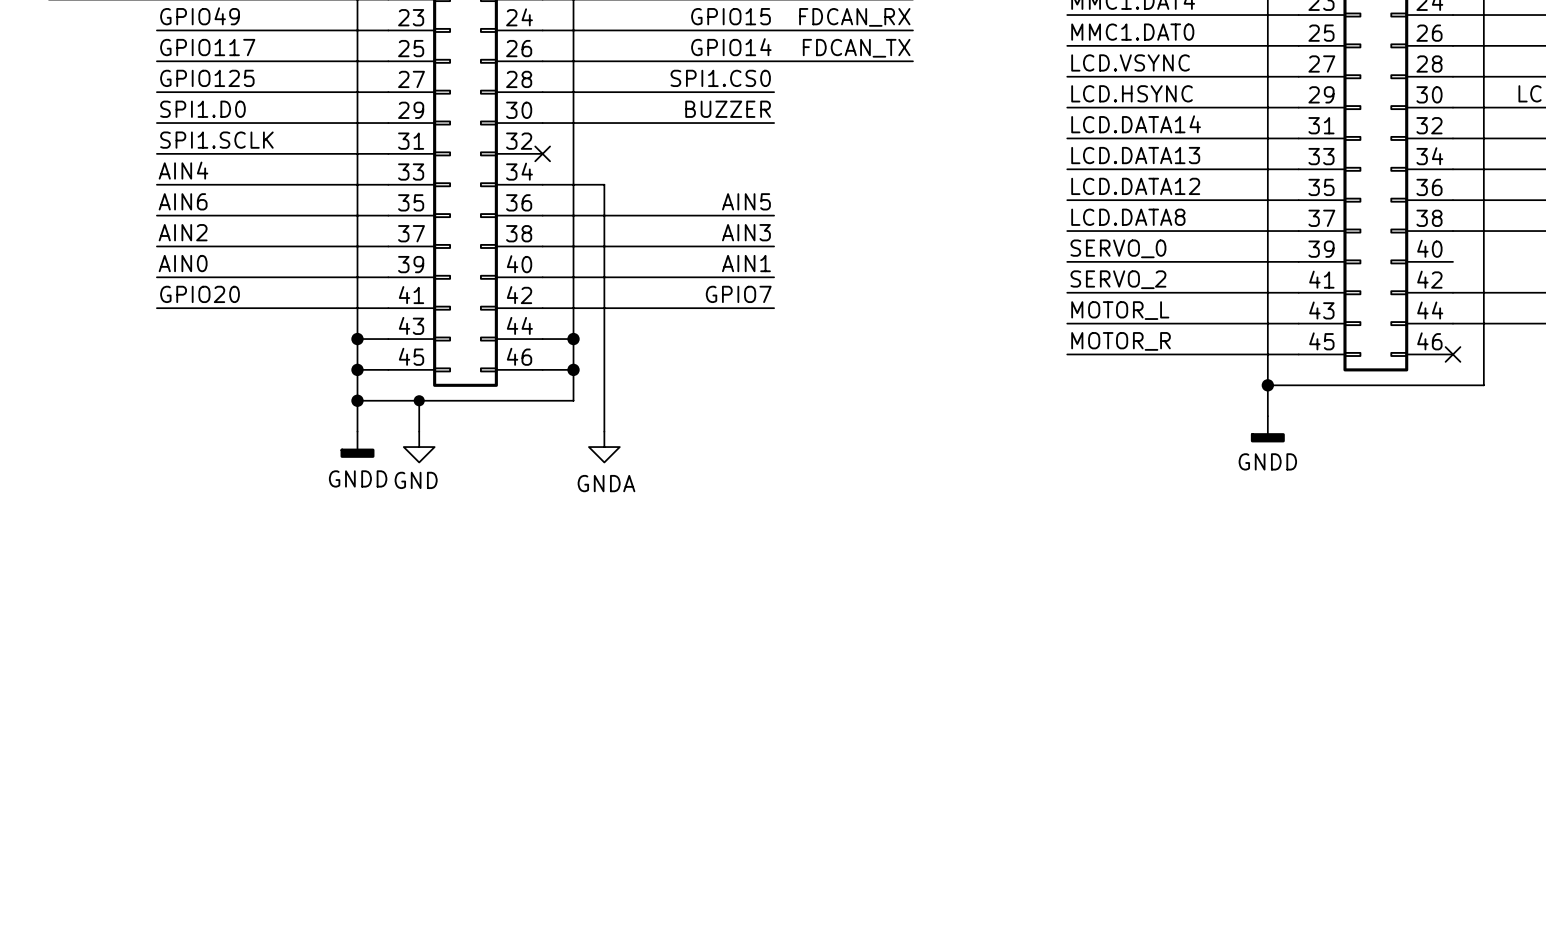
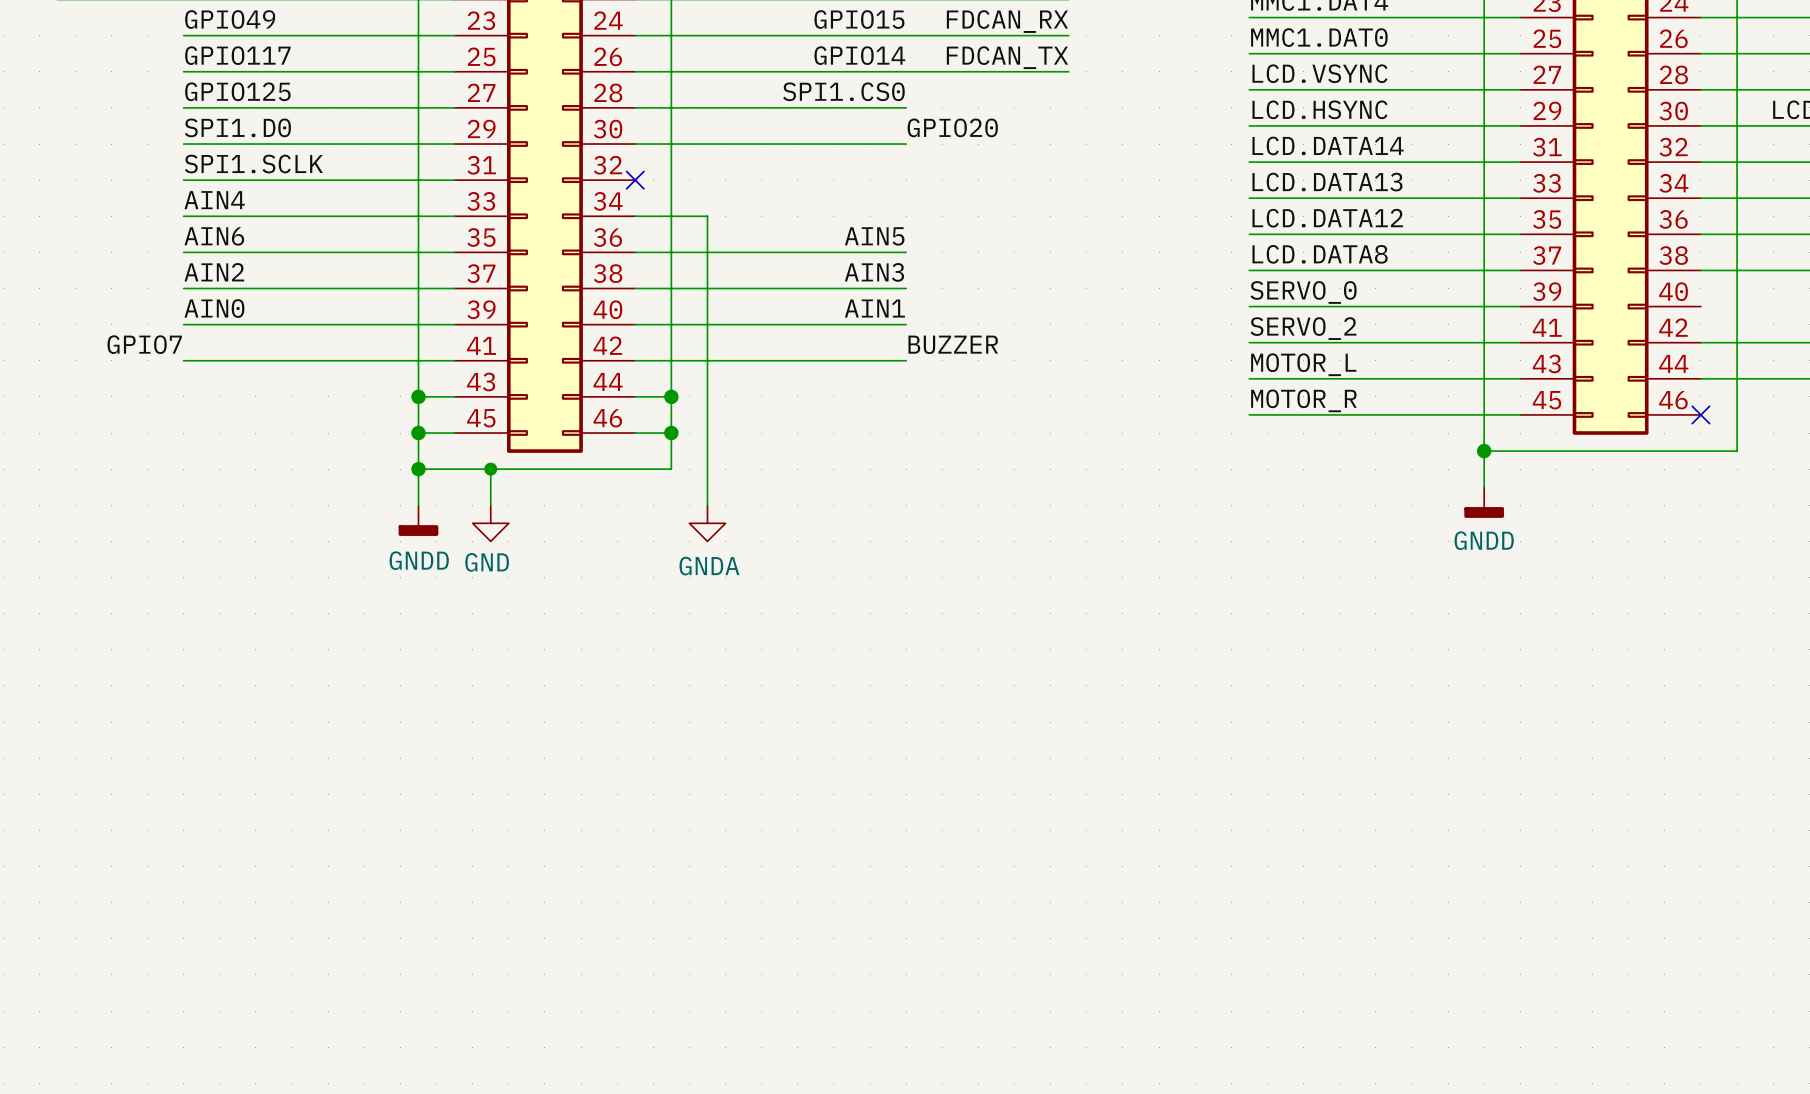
label: BUZZER (728, 109) -> GPIO20 (952, 127)
label: GPIO20 (200, 294) -> GPIO7 (144, 344)
label: GPIO7 (738, 294) -> BUZZER (953, 344)

